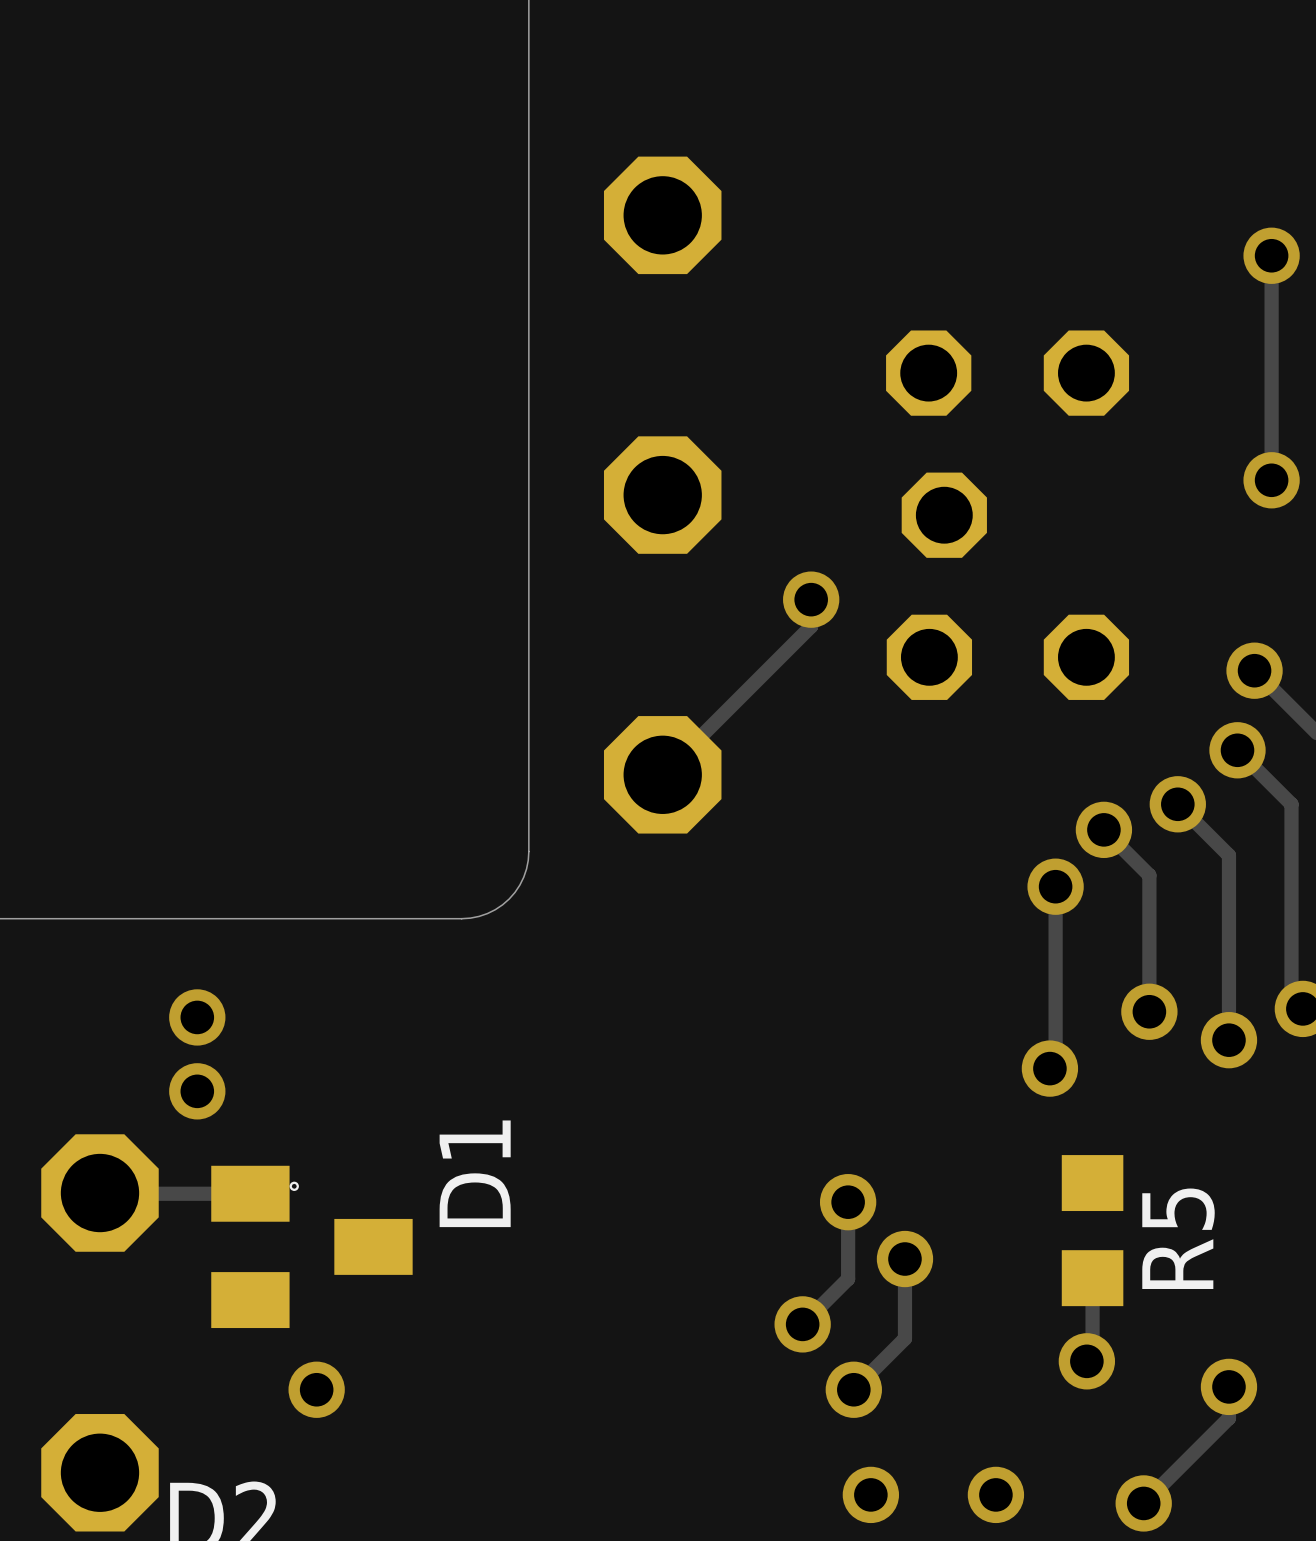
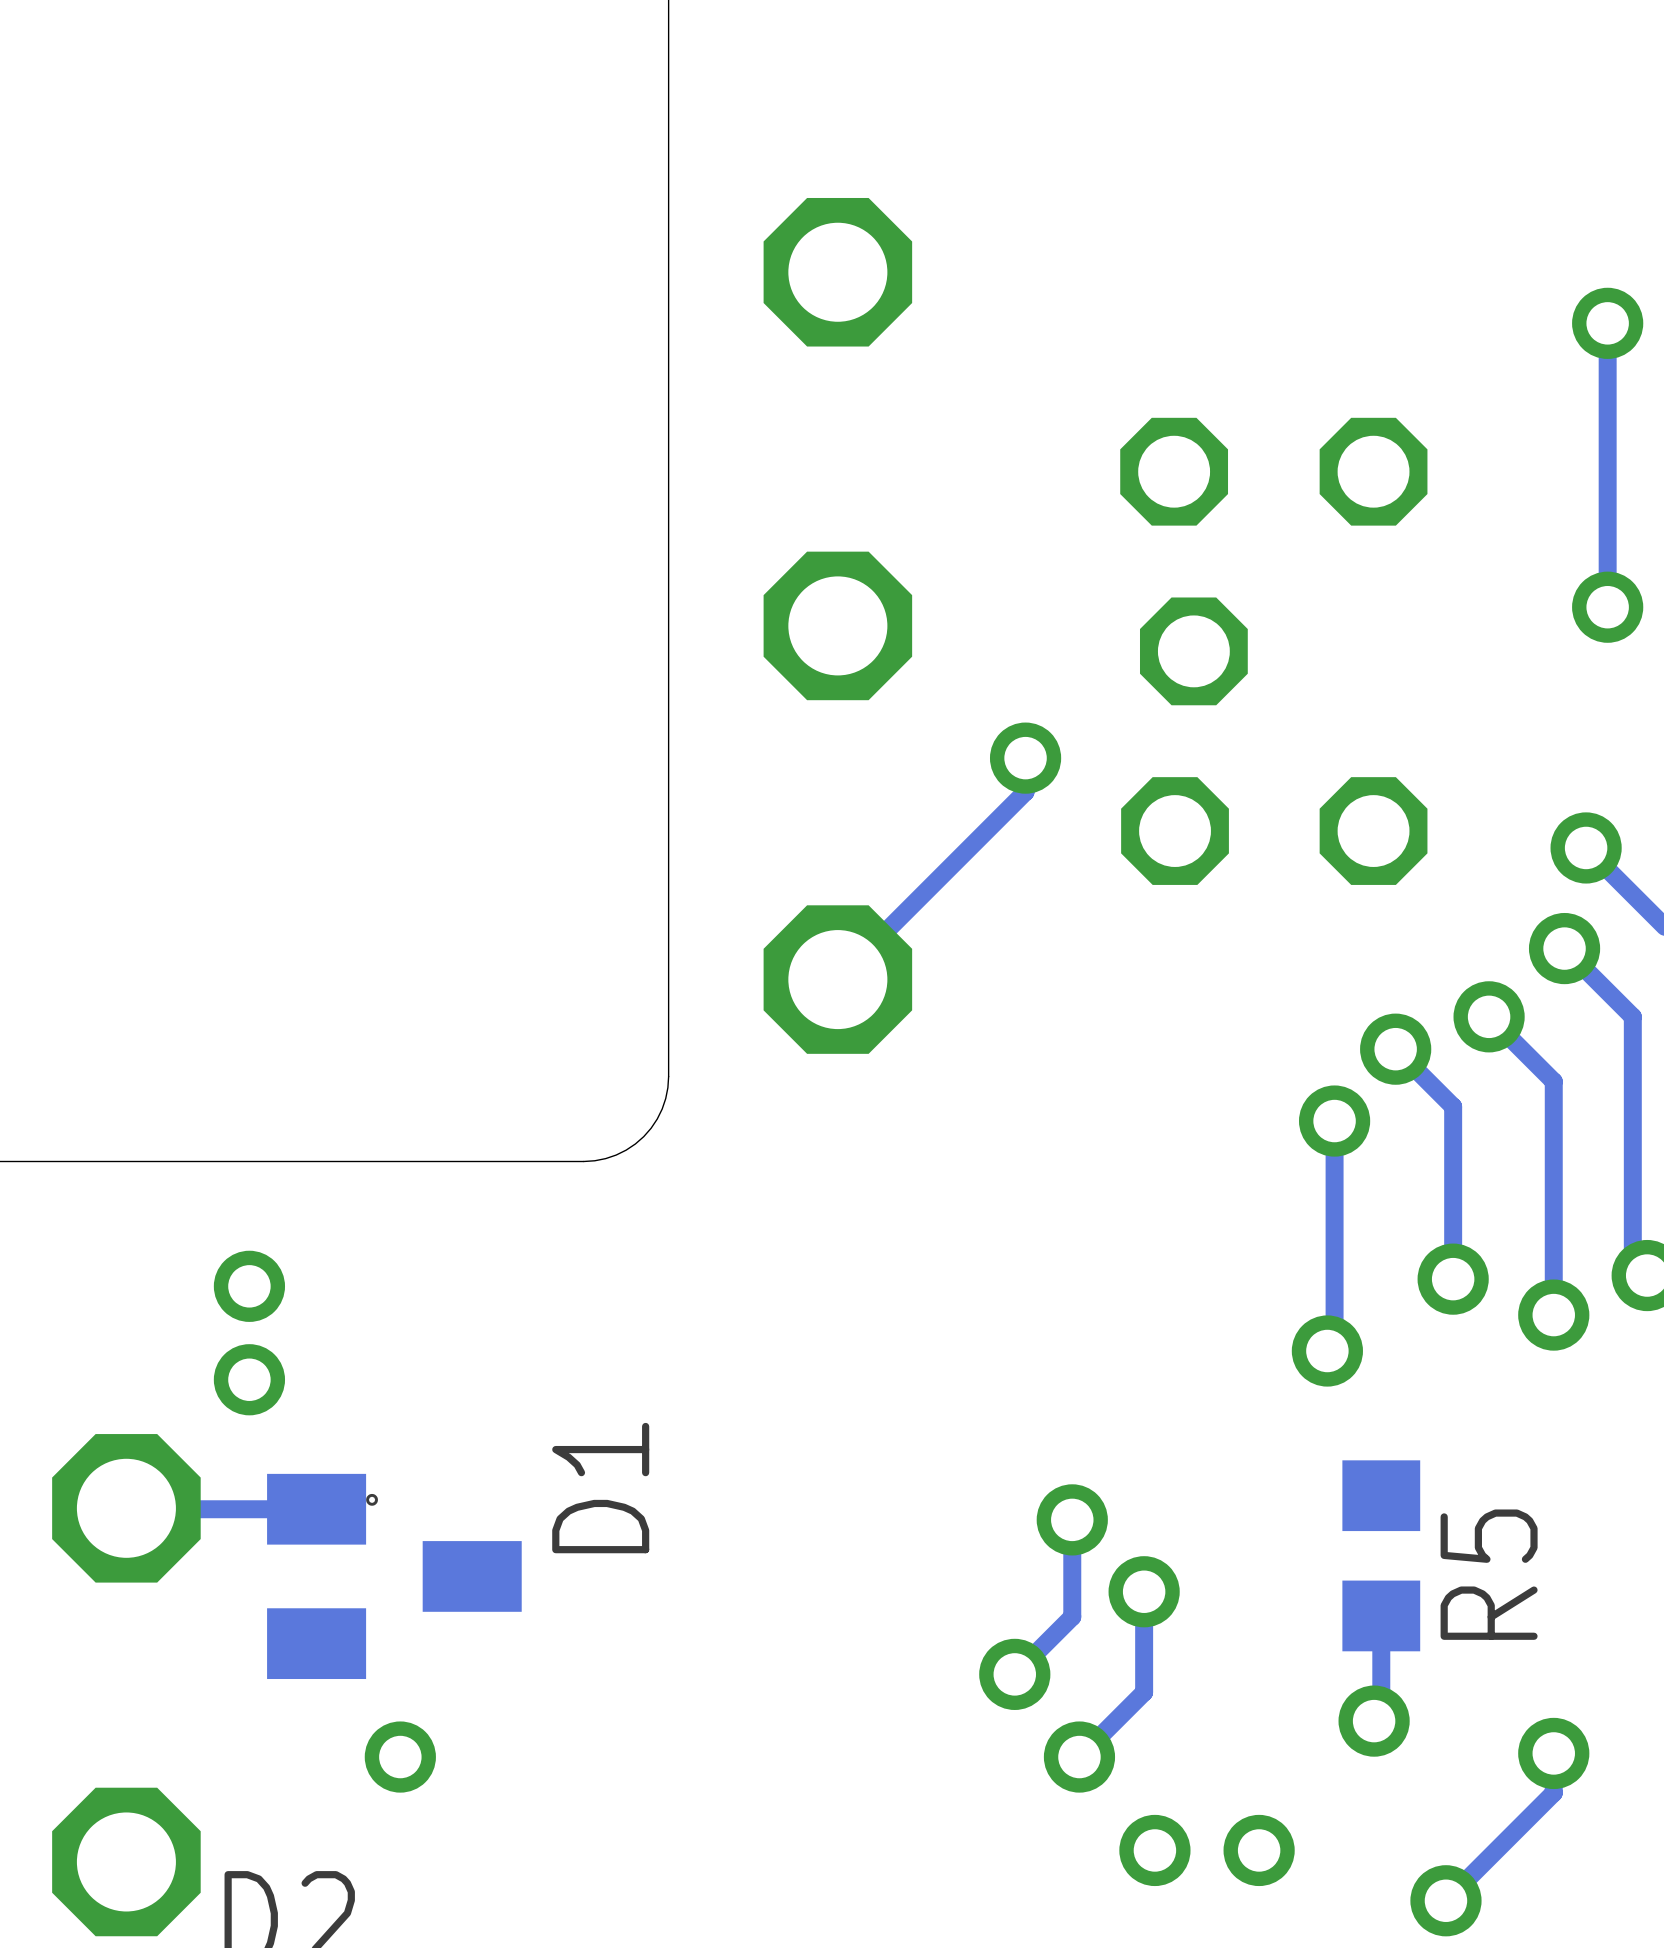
via position: (870, 1494) -> (1154, 1850)
via position: (995, 1494) -> (1259, 1850)

